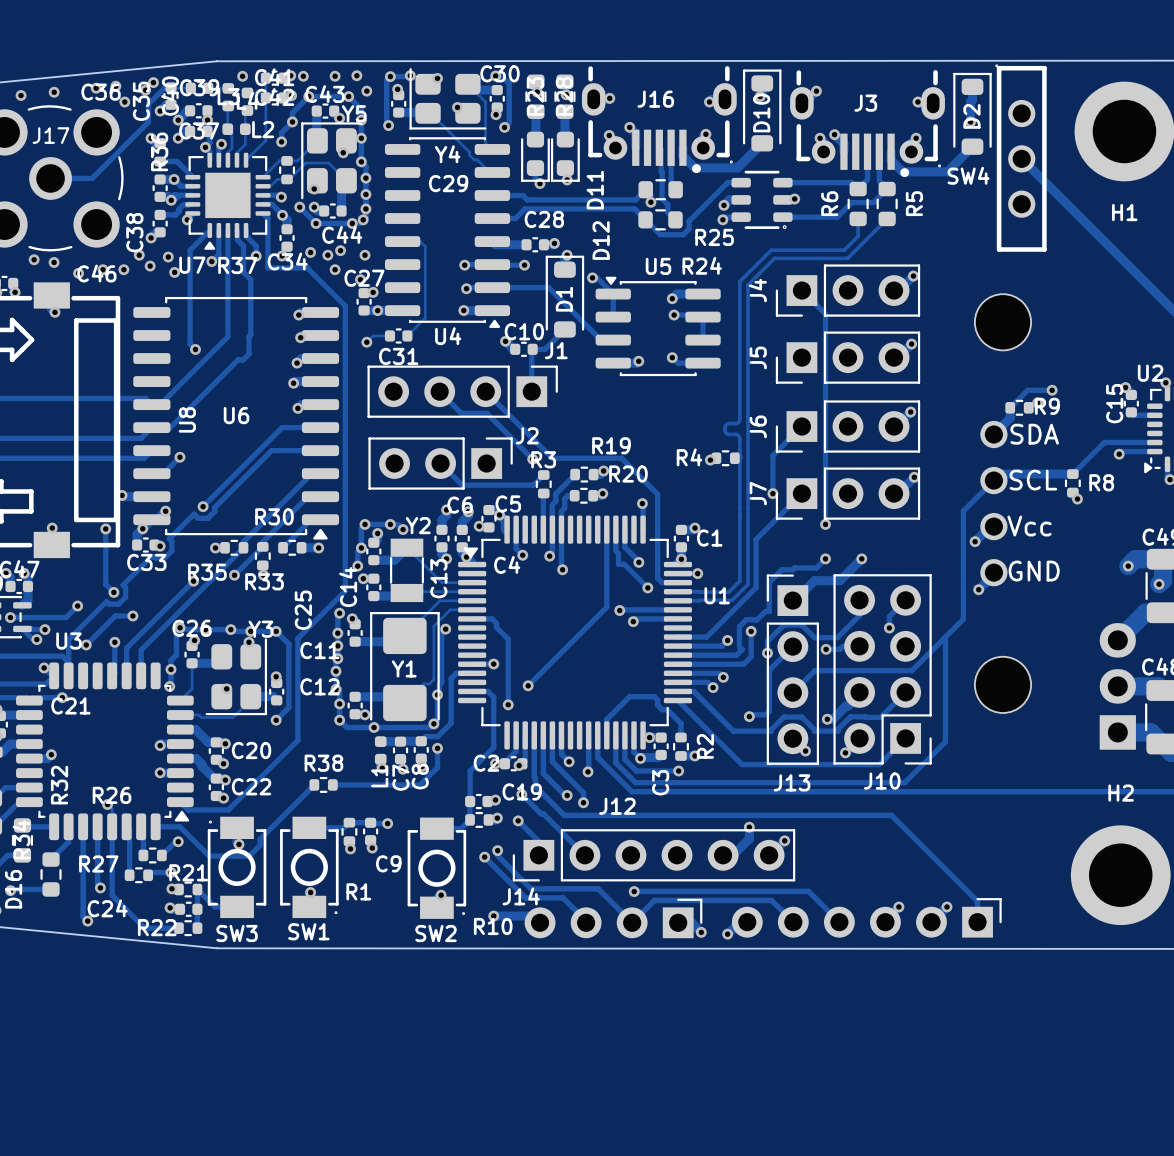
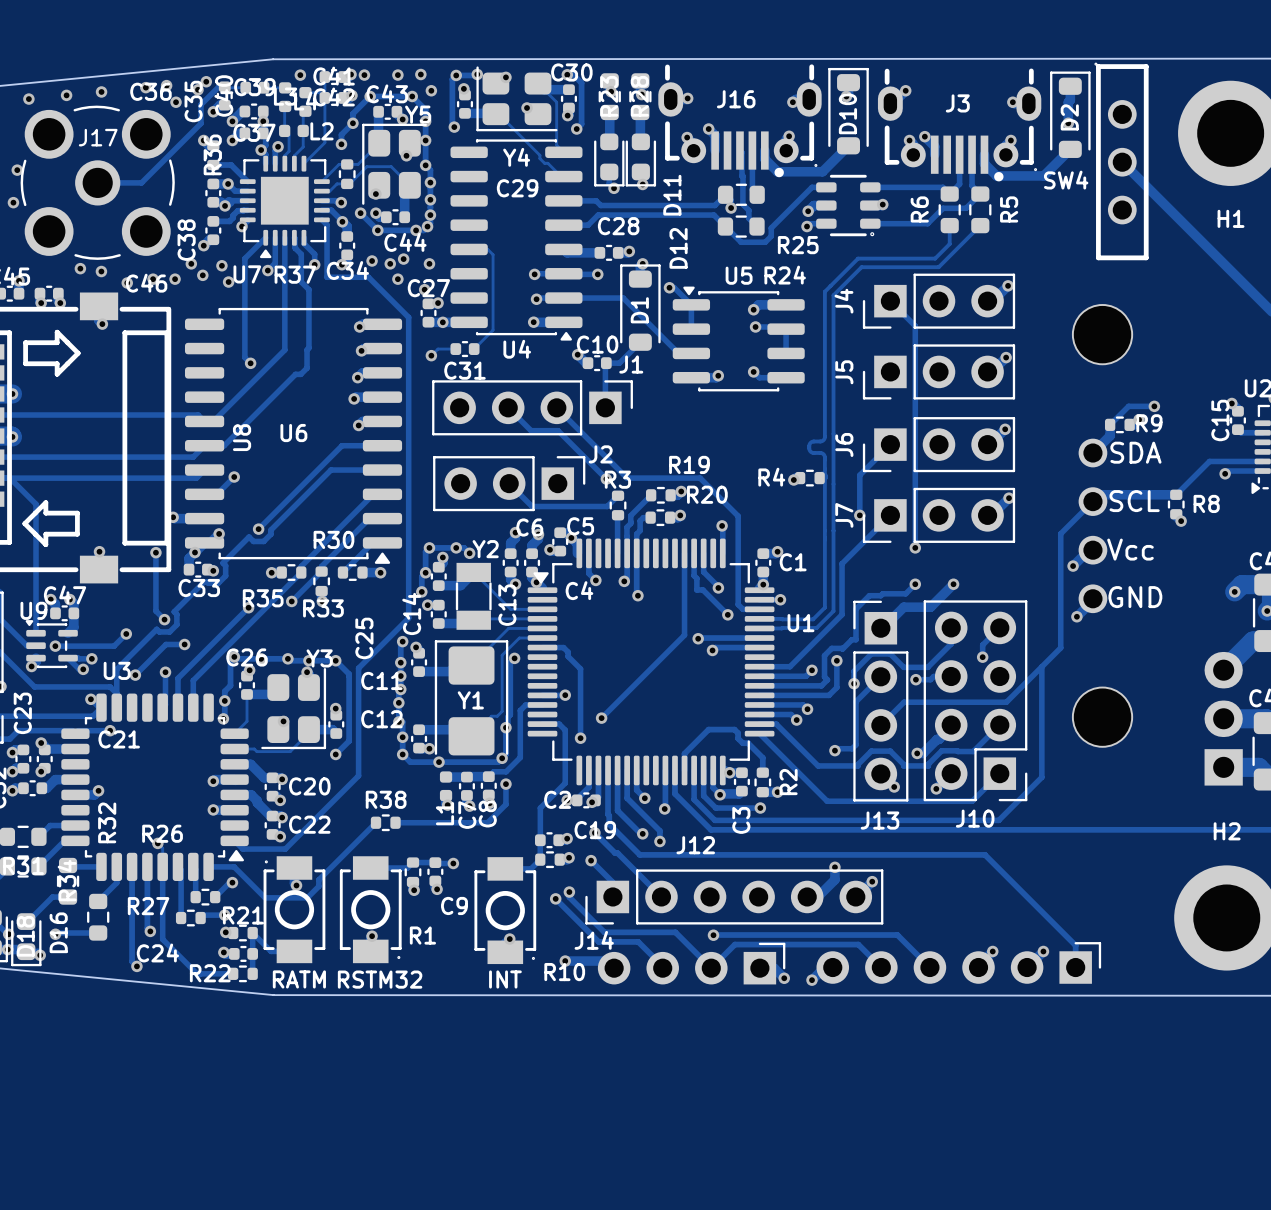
SW1 name: SW1 (308, 931) -> RSTM32 (380, 979)
SW3 name: SW3 (237, 933) -> RATM (299, 979)
SW2 name: SW2 (435, 933) -> INT (505, 979)

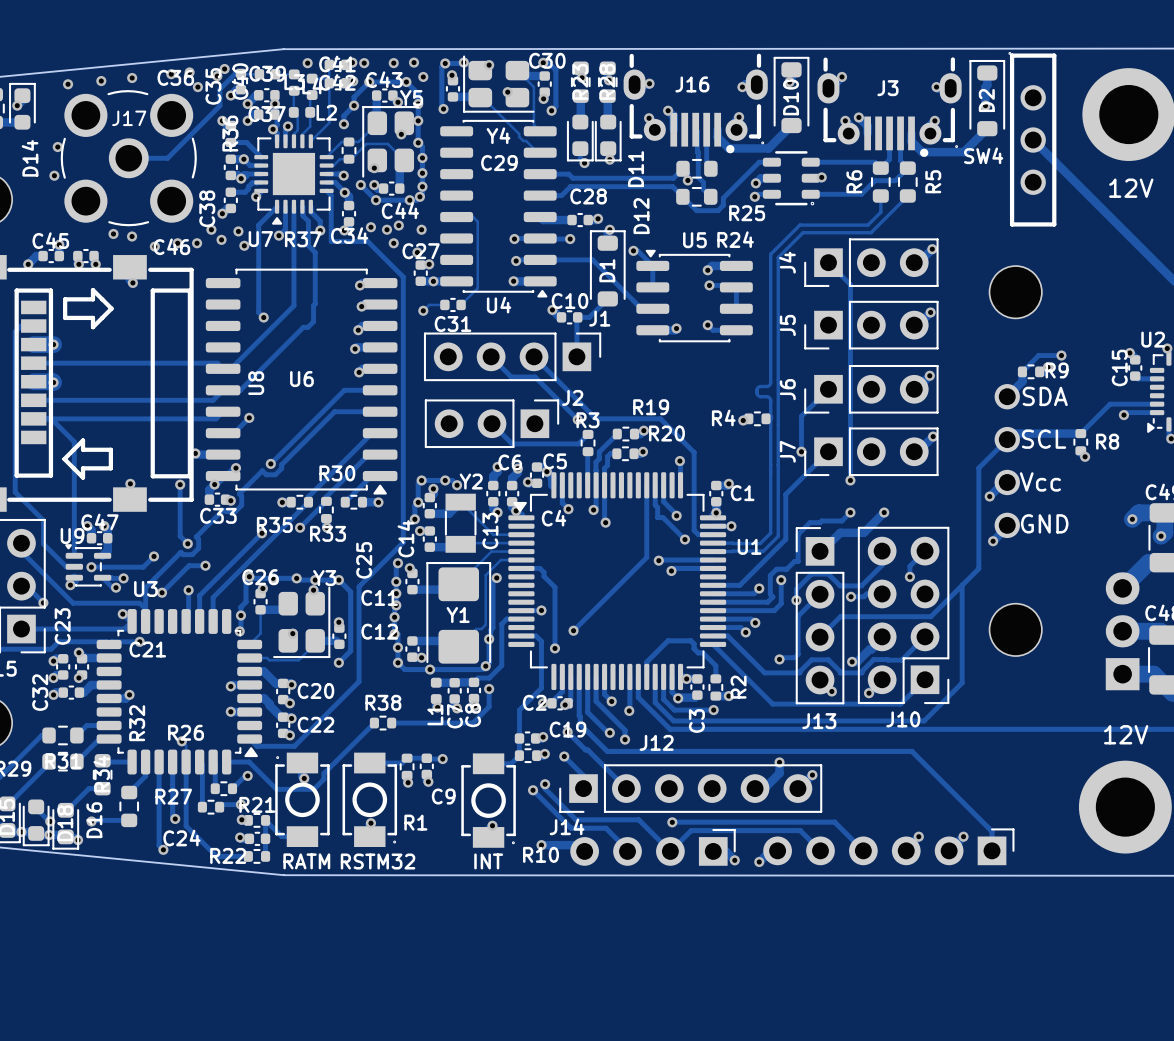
H1 value: none -> 12V (1131, 188)
H1 name: H1 (1231, 218) -> none
H2 name: H2 (1227, 831) -> none
H2 value: none -> 12V (1126, 734)

